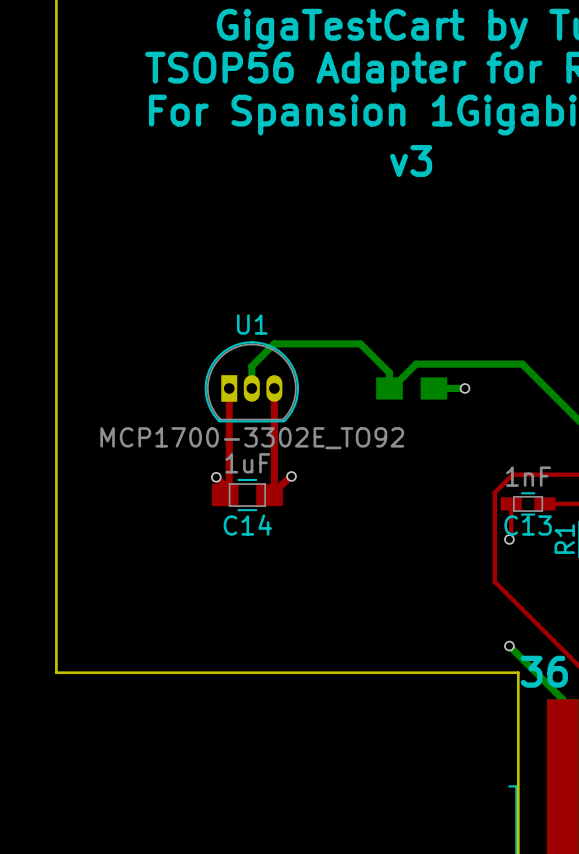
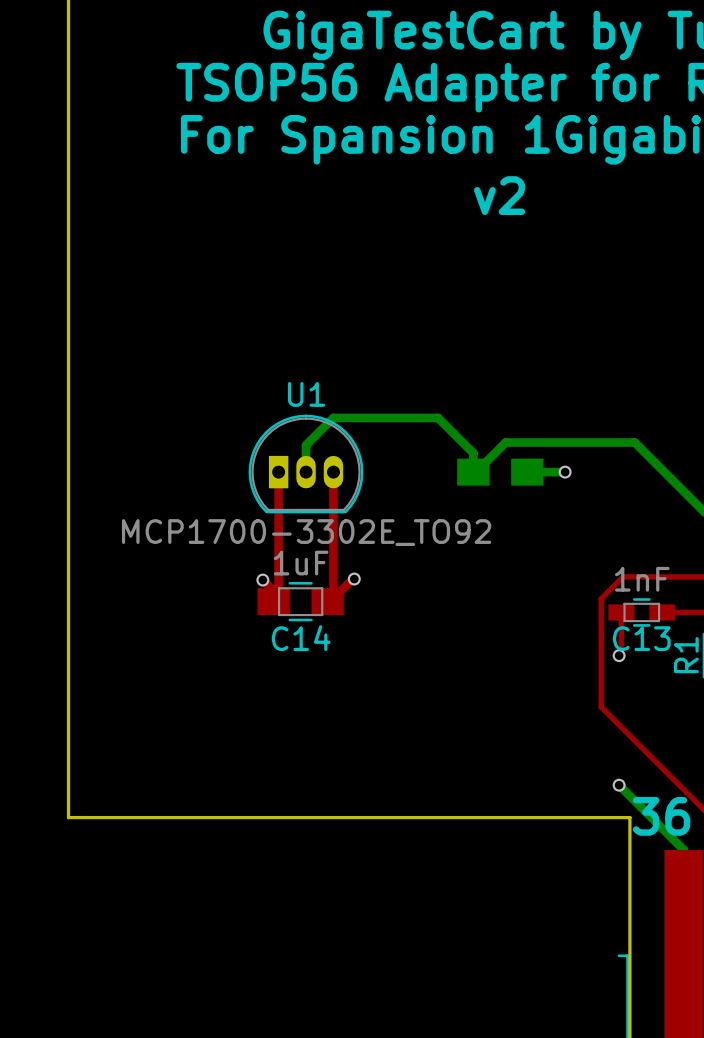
text: v3 (411, 160) -> v2 (499, 195)

